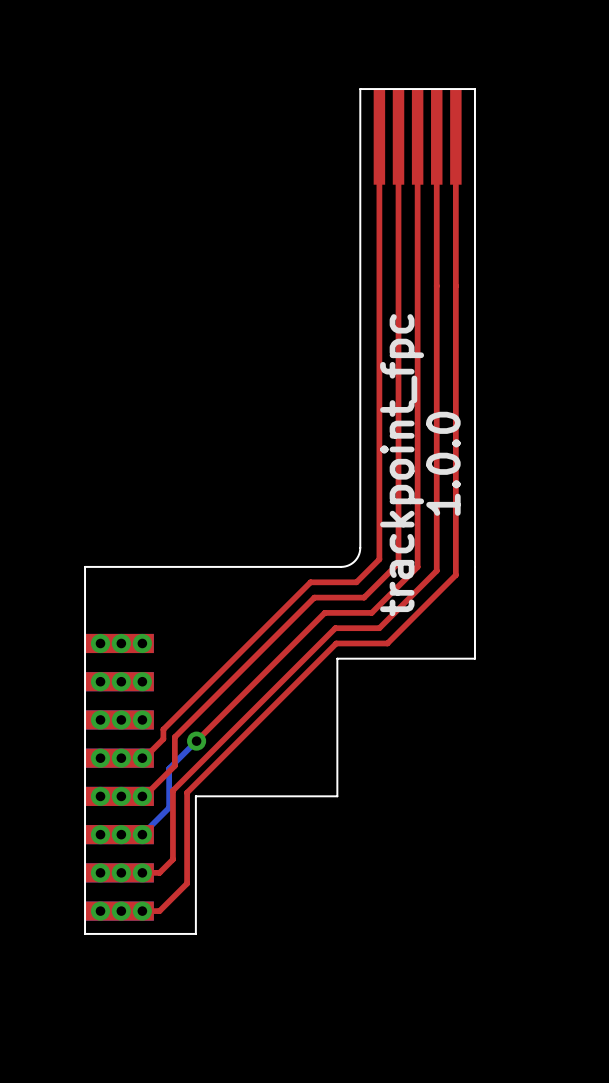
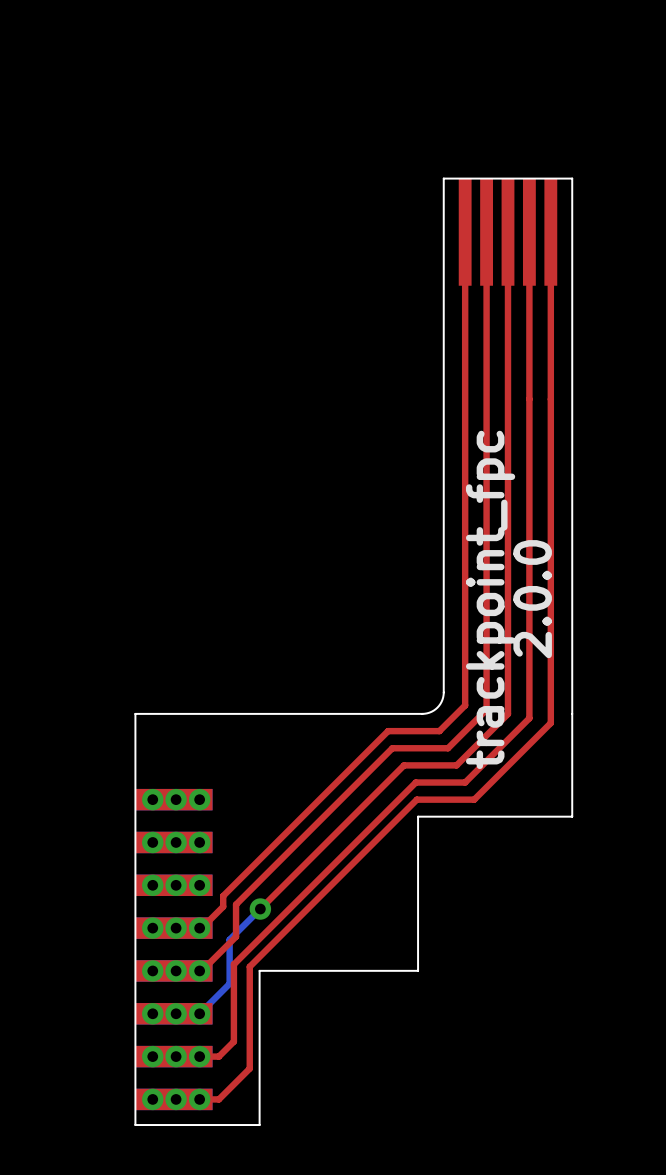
text: 1.0.0 (443, 463) -> 2.0.0 (532, 599)

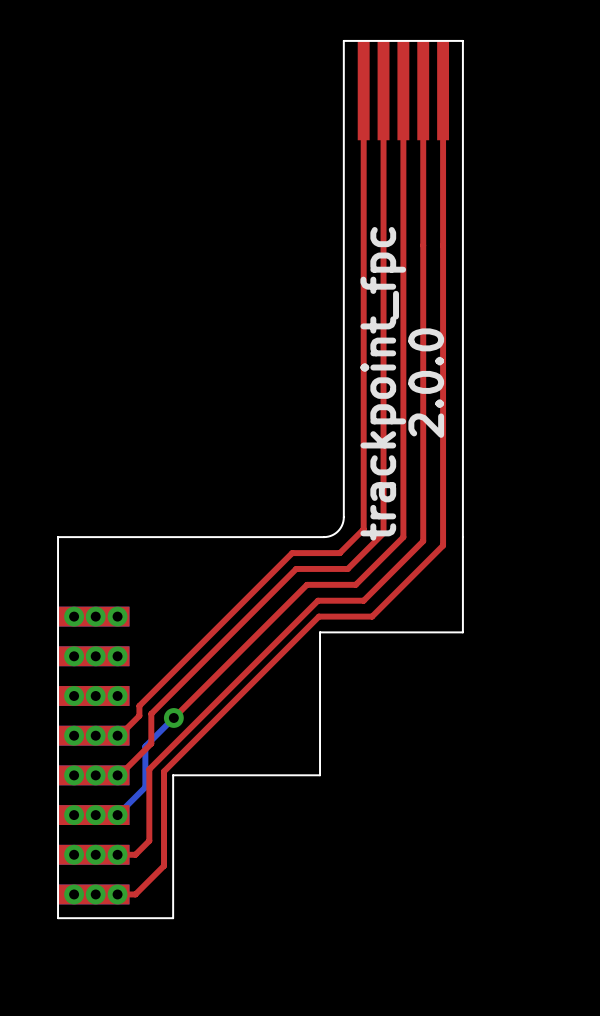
text position: trackpoint_fpc (490, 599) -> trackpoint_fpc (383, 383)
text position: 2.0.0 (532, 599) -> 2.0.0 (426, 383)

